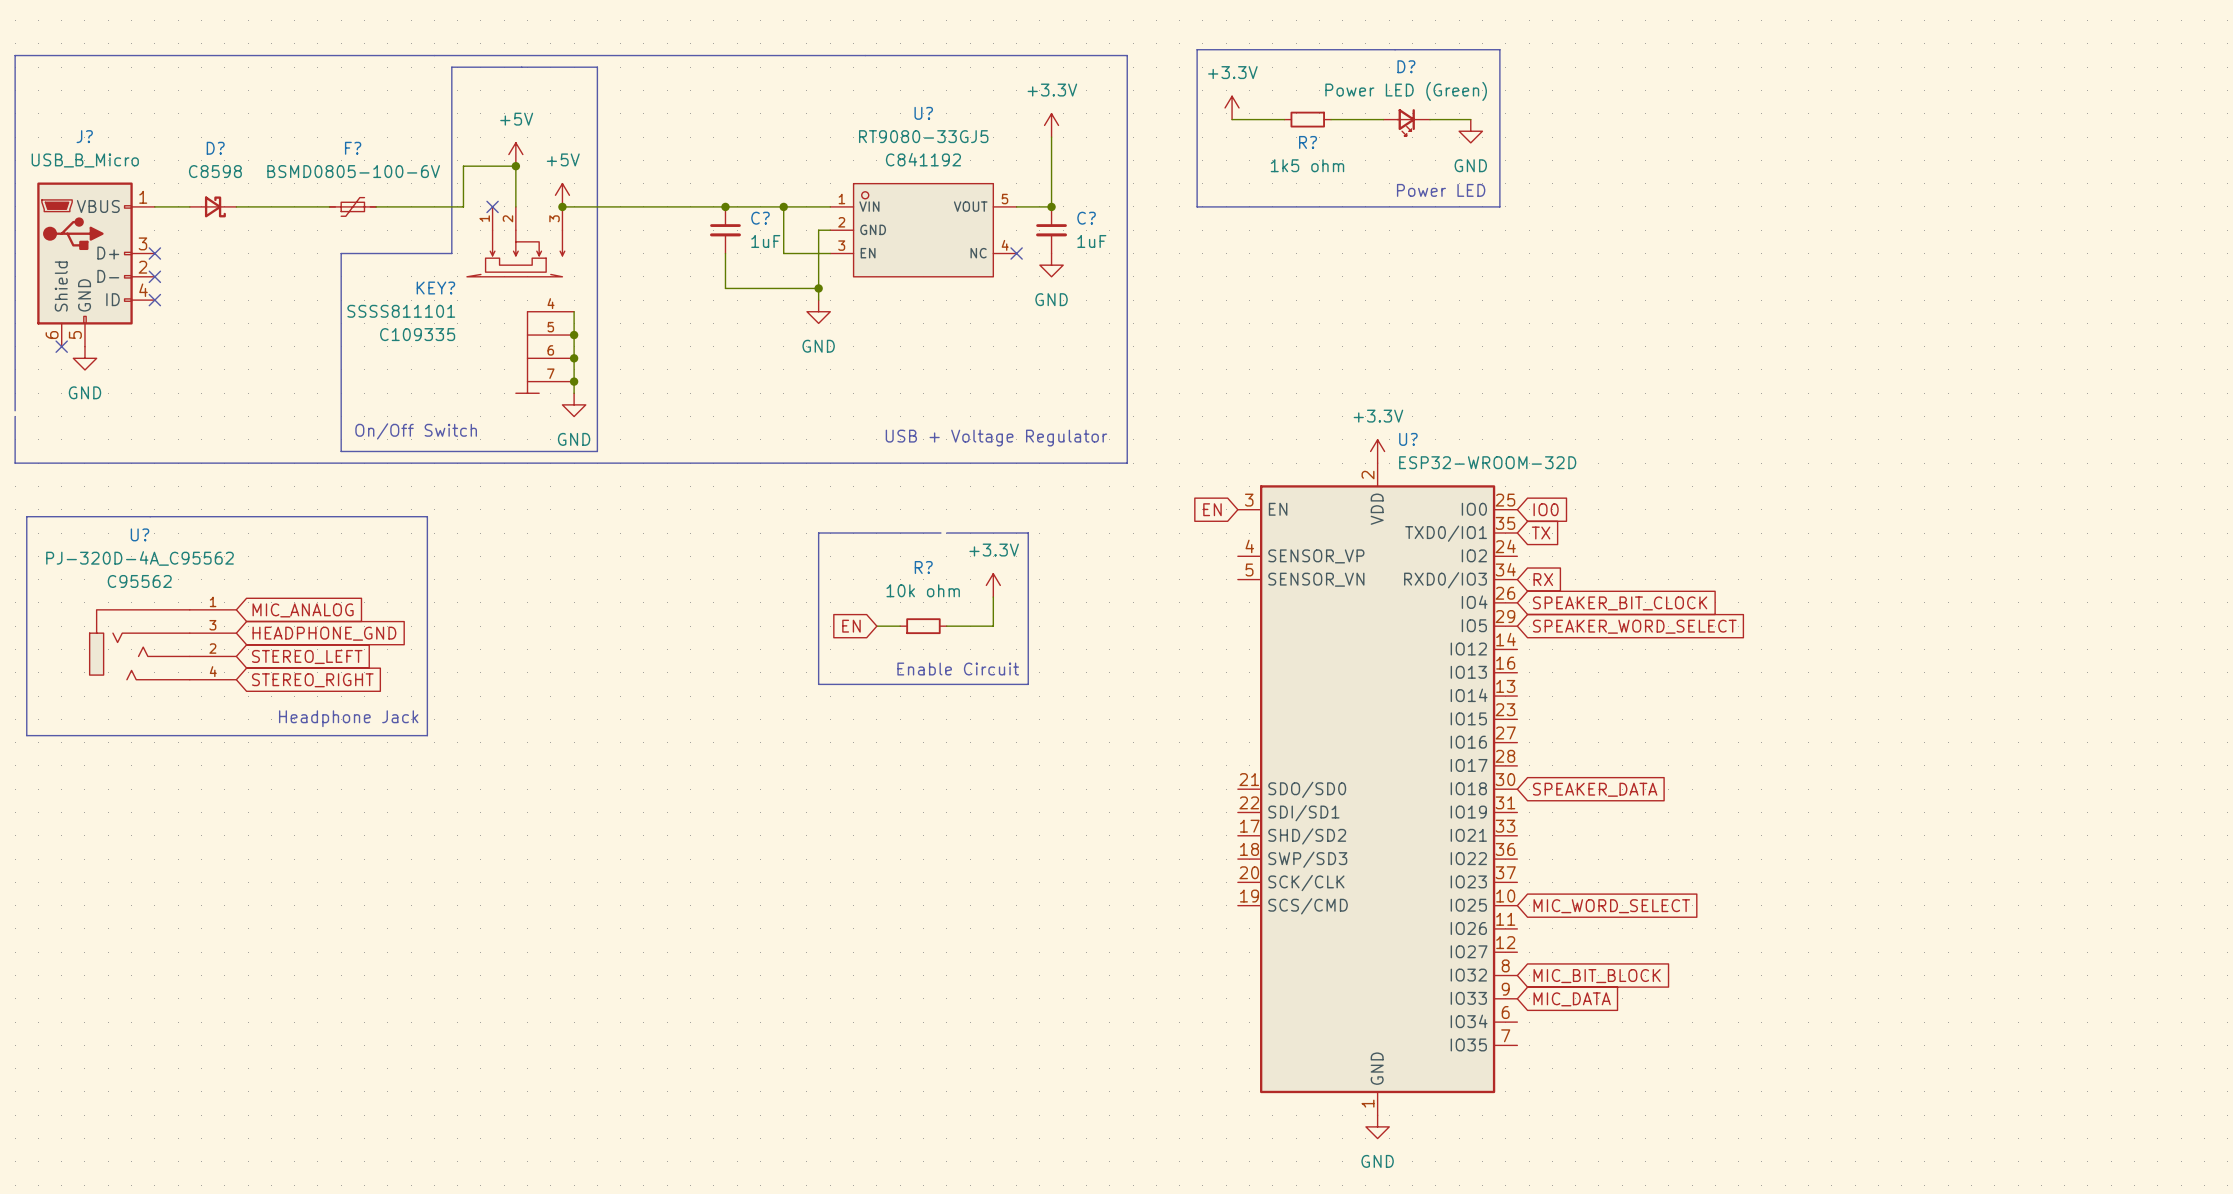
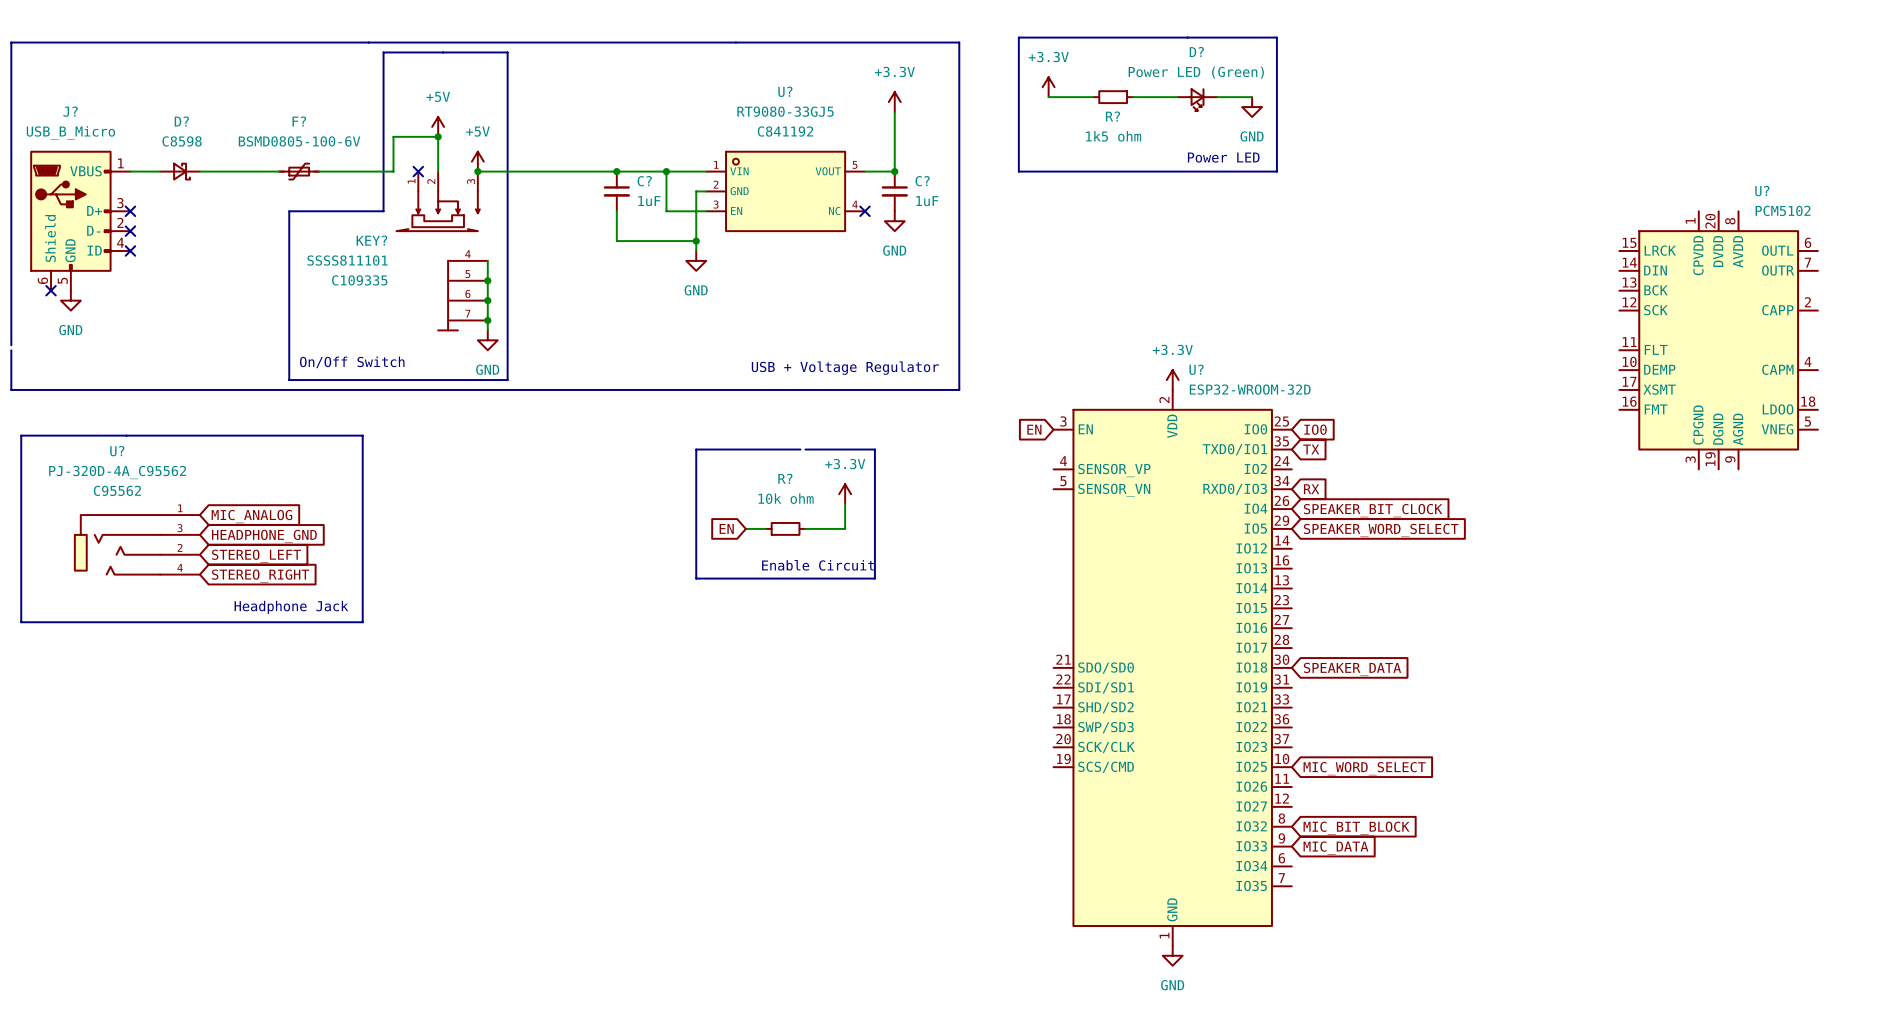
U?: none -> PCM5102 (1718, 340)

